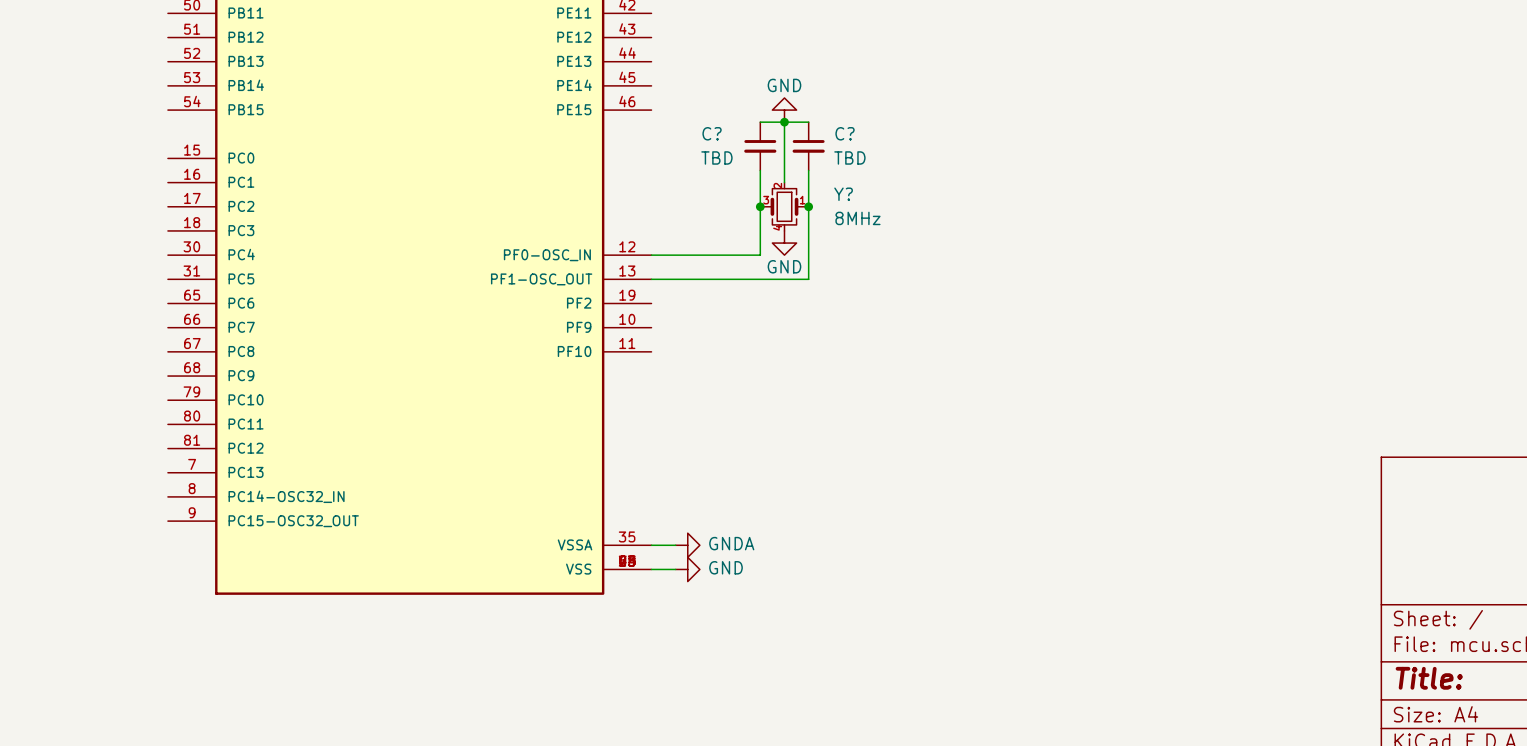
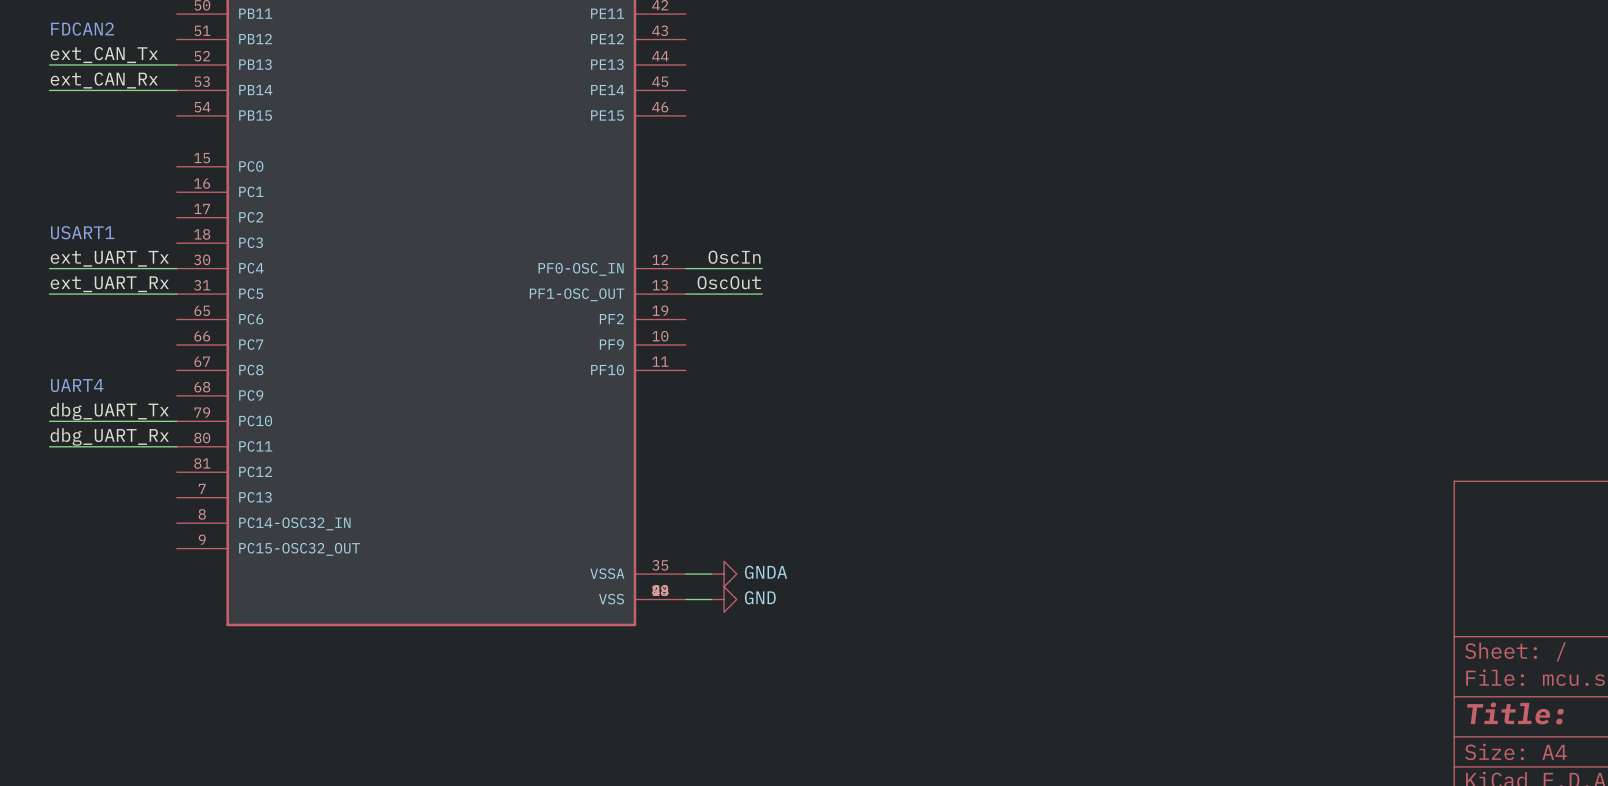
text: none -> FDCAN2 (82, 29)
label: none -> ext_CAN_Tx (104, 55)
wire: none -> (49, 64) (176, 64)
label: none -> ext_CAN_Rx (104, 80)
wire: none -> (49, 90) (176, 90)
power symbol: GND (784, 110) -> none
wire: (760, 122) (808, 122) -> none
wire: (784, 122) (784, 182) -> none
junction: (784, 122) -> none
C?: TBD (760, 146) -> none
C?: TBD (808, 146) -> none
wire: (760, 170) (760, 255) (724, 255) -> none
wire: (808, 170) (808, 279) (724, 279) -> none
junction: (760, 206) -> none
Y?: 8MHz (784, 206) -> none
junction: (808, 206) -> none
text: none -> USART1 (82, 232)
power symbol: GND (784, 243) -> none
label: none -> ext_UART_Tx (109, 258)
label: none -> OscIn (734, 257)
wire: none -> (49, 268) (176, 268)
label: none -> OscOut (729, 282)
label: none -> ext_UART_Rx (109, 284)
wire: none -> (49, 294) (176, 294)
text: none -> UART4 (77, 385)
label: none -> dbg_UART_Tx (109, 411)
wire: none -> (49, 421) (176, 421)
label: none -> dbg_UART_Rx (109, 436)
wire: none -> (49, 446) (176, 446)

